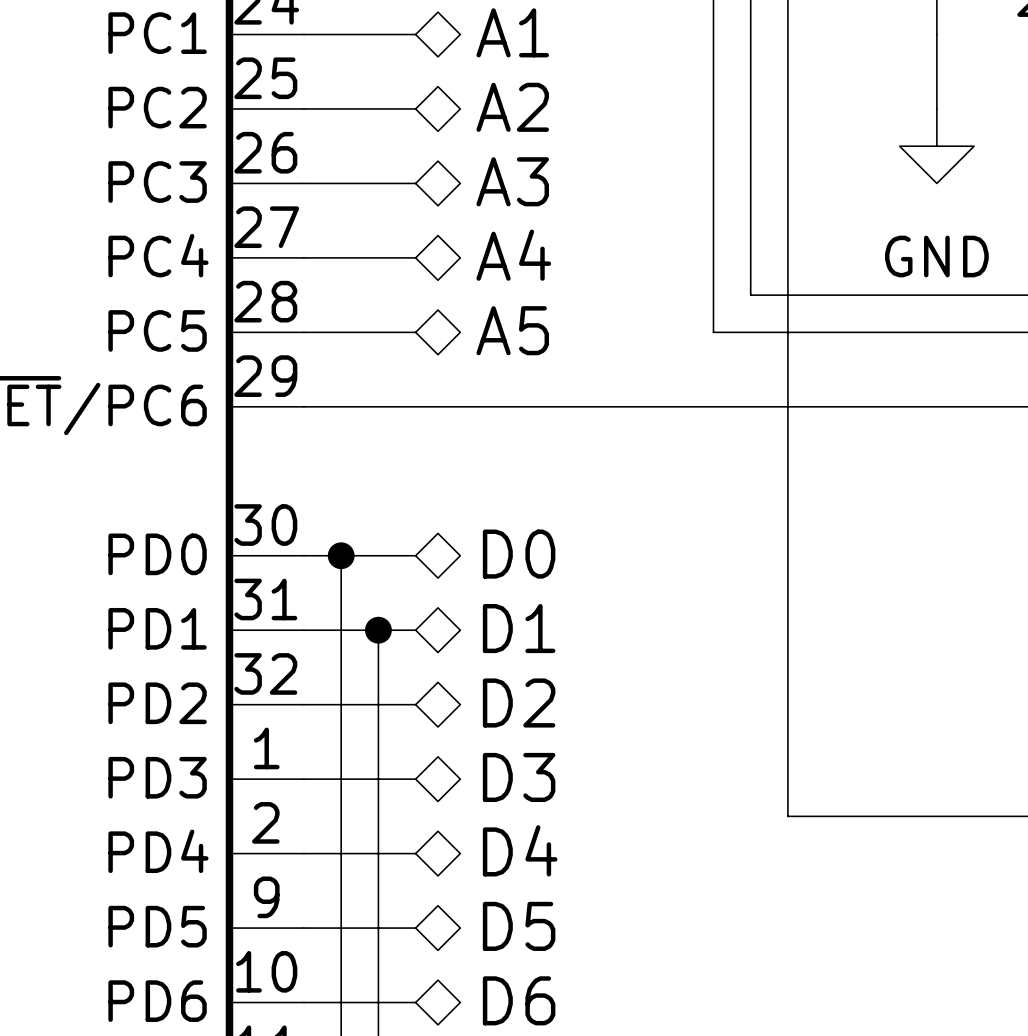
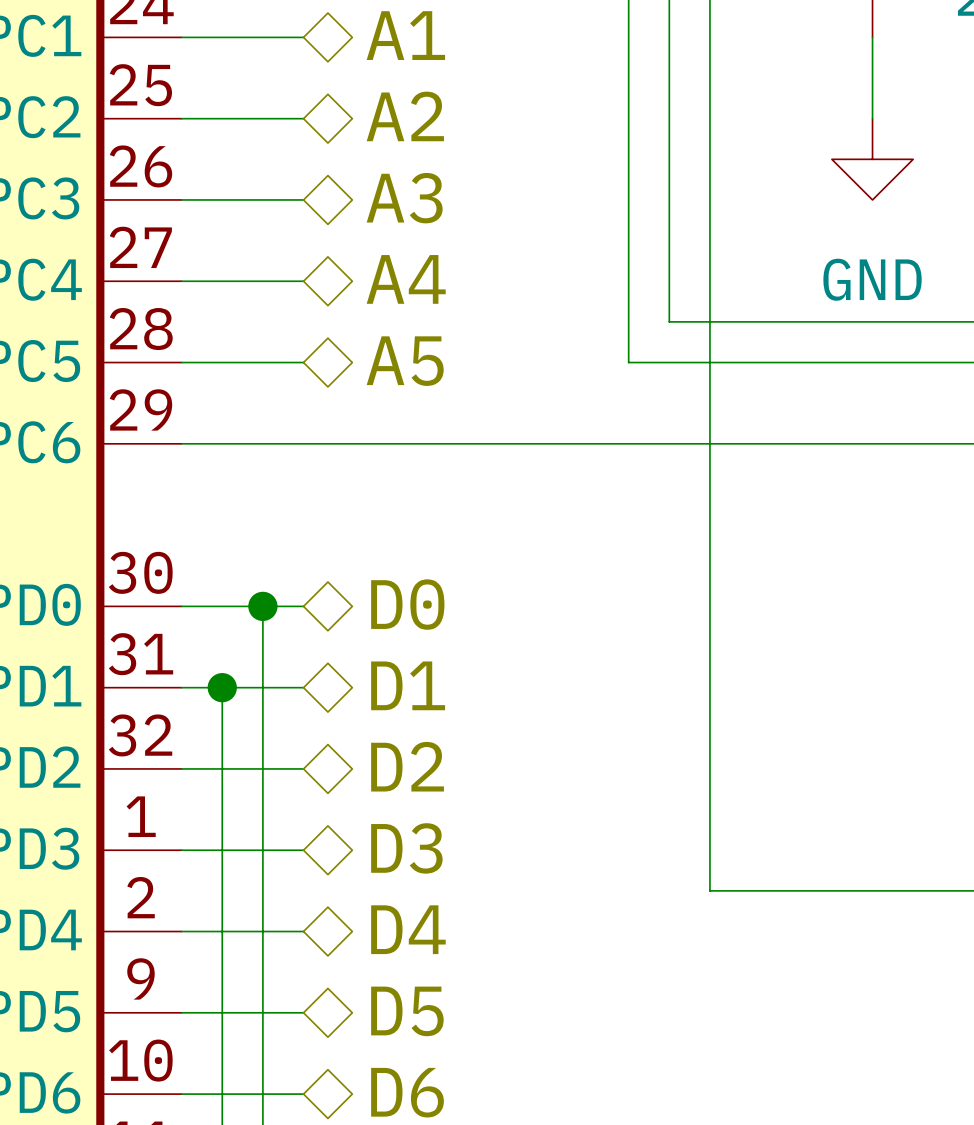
wire: (341, 555) (341, 630) -> (262, 606) (262, 687)
junction: (341, 555) -> none
junction: none -> (262, 606)
junction: none -> (222, 687)
junction: (378, 630) -> none

